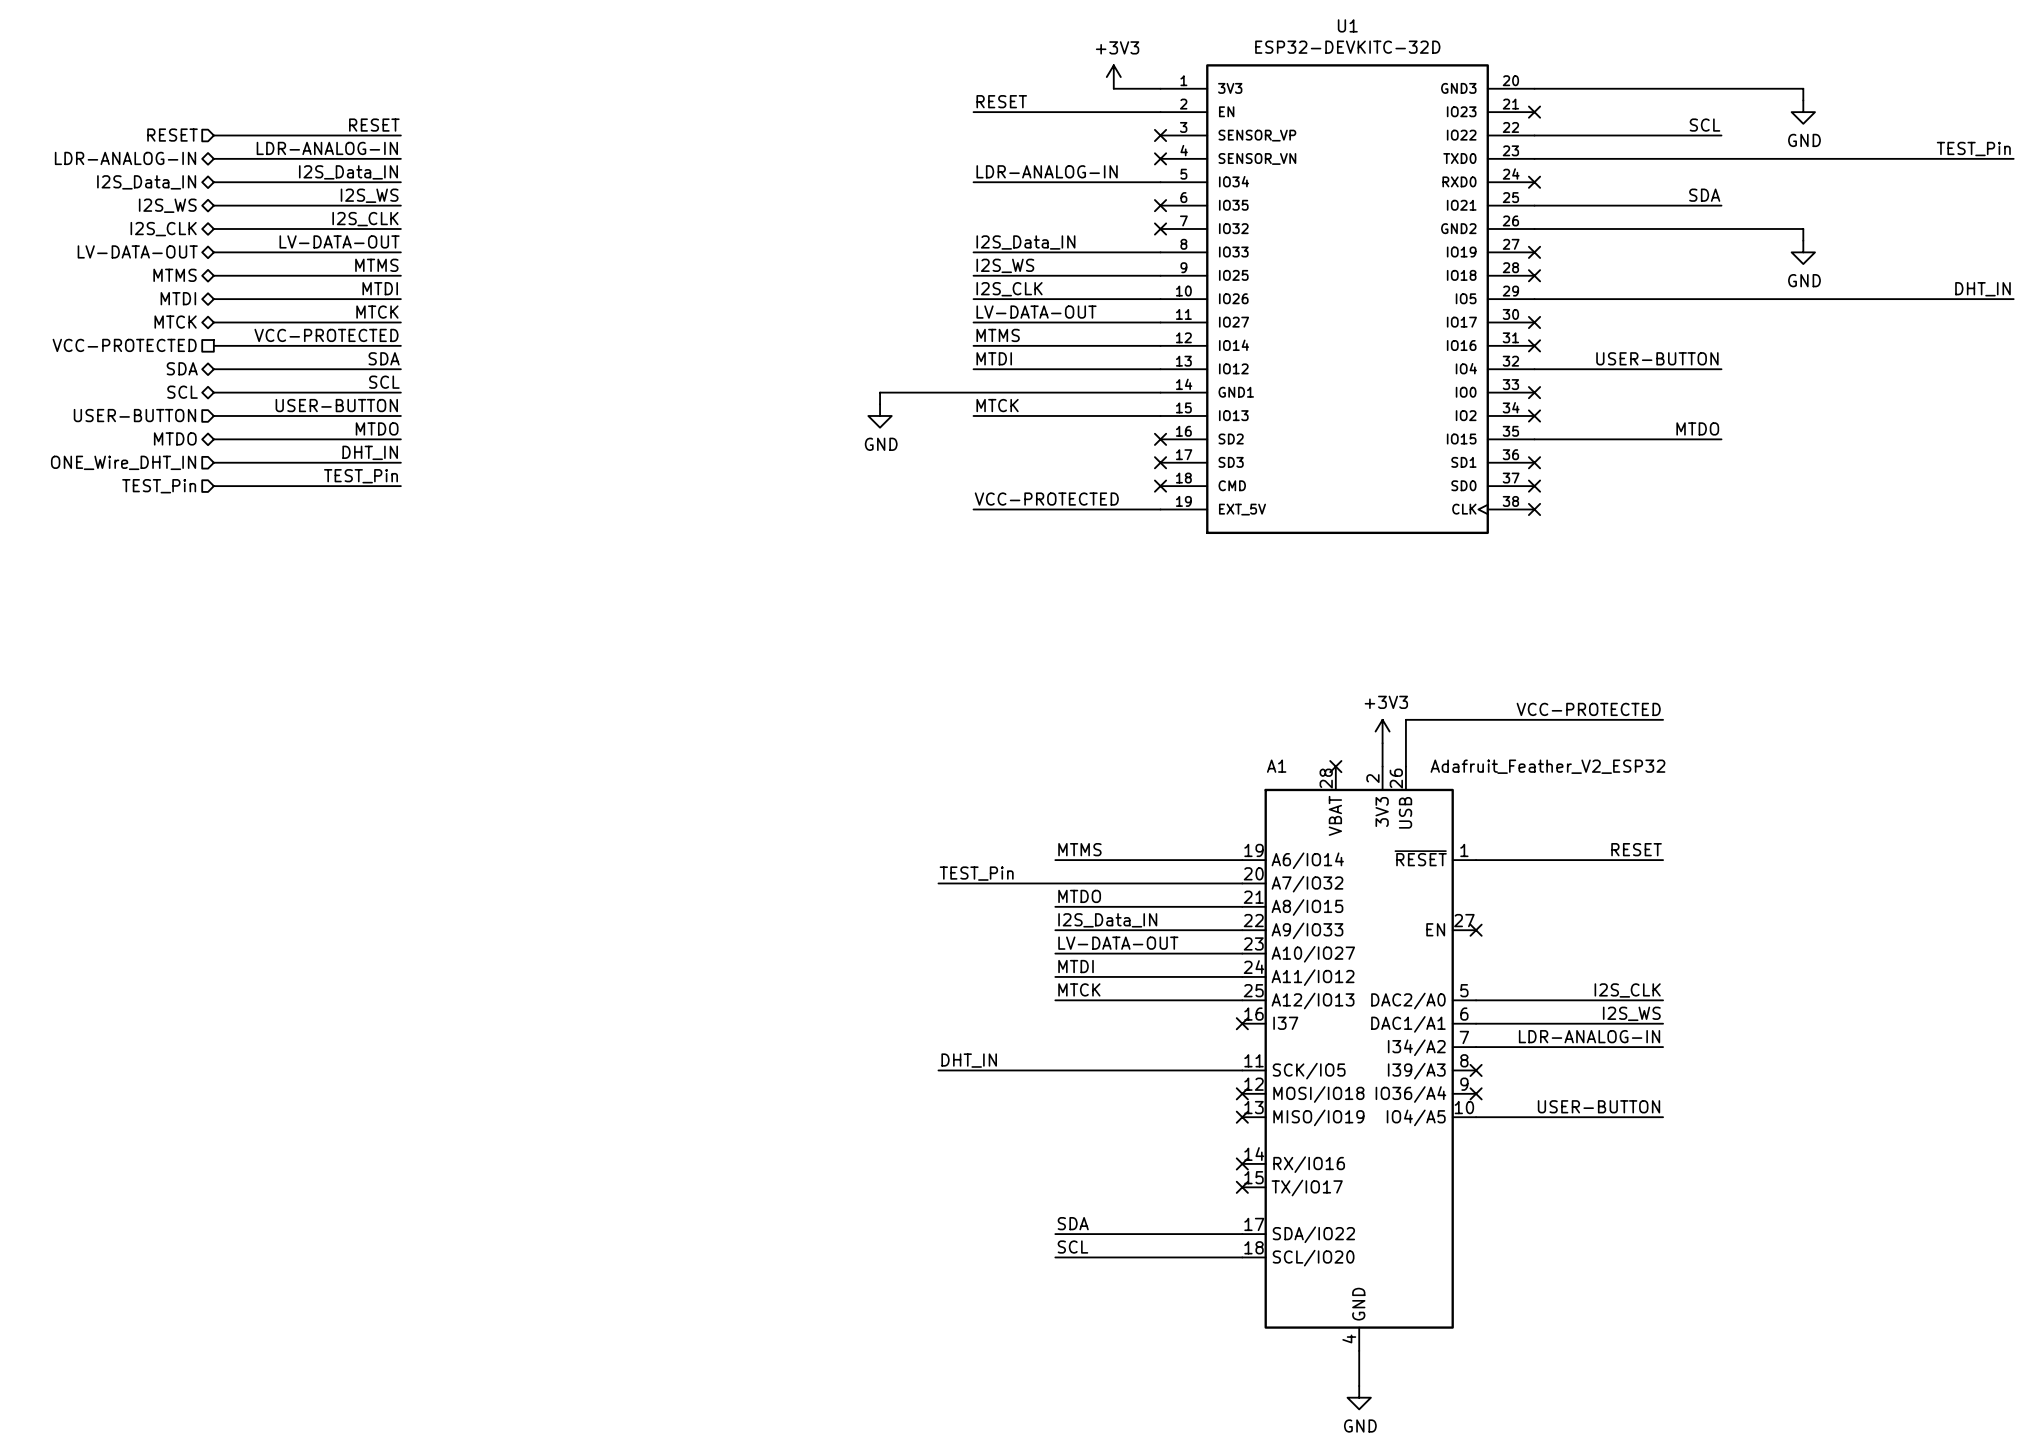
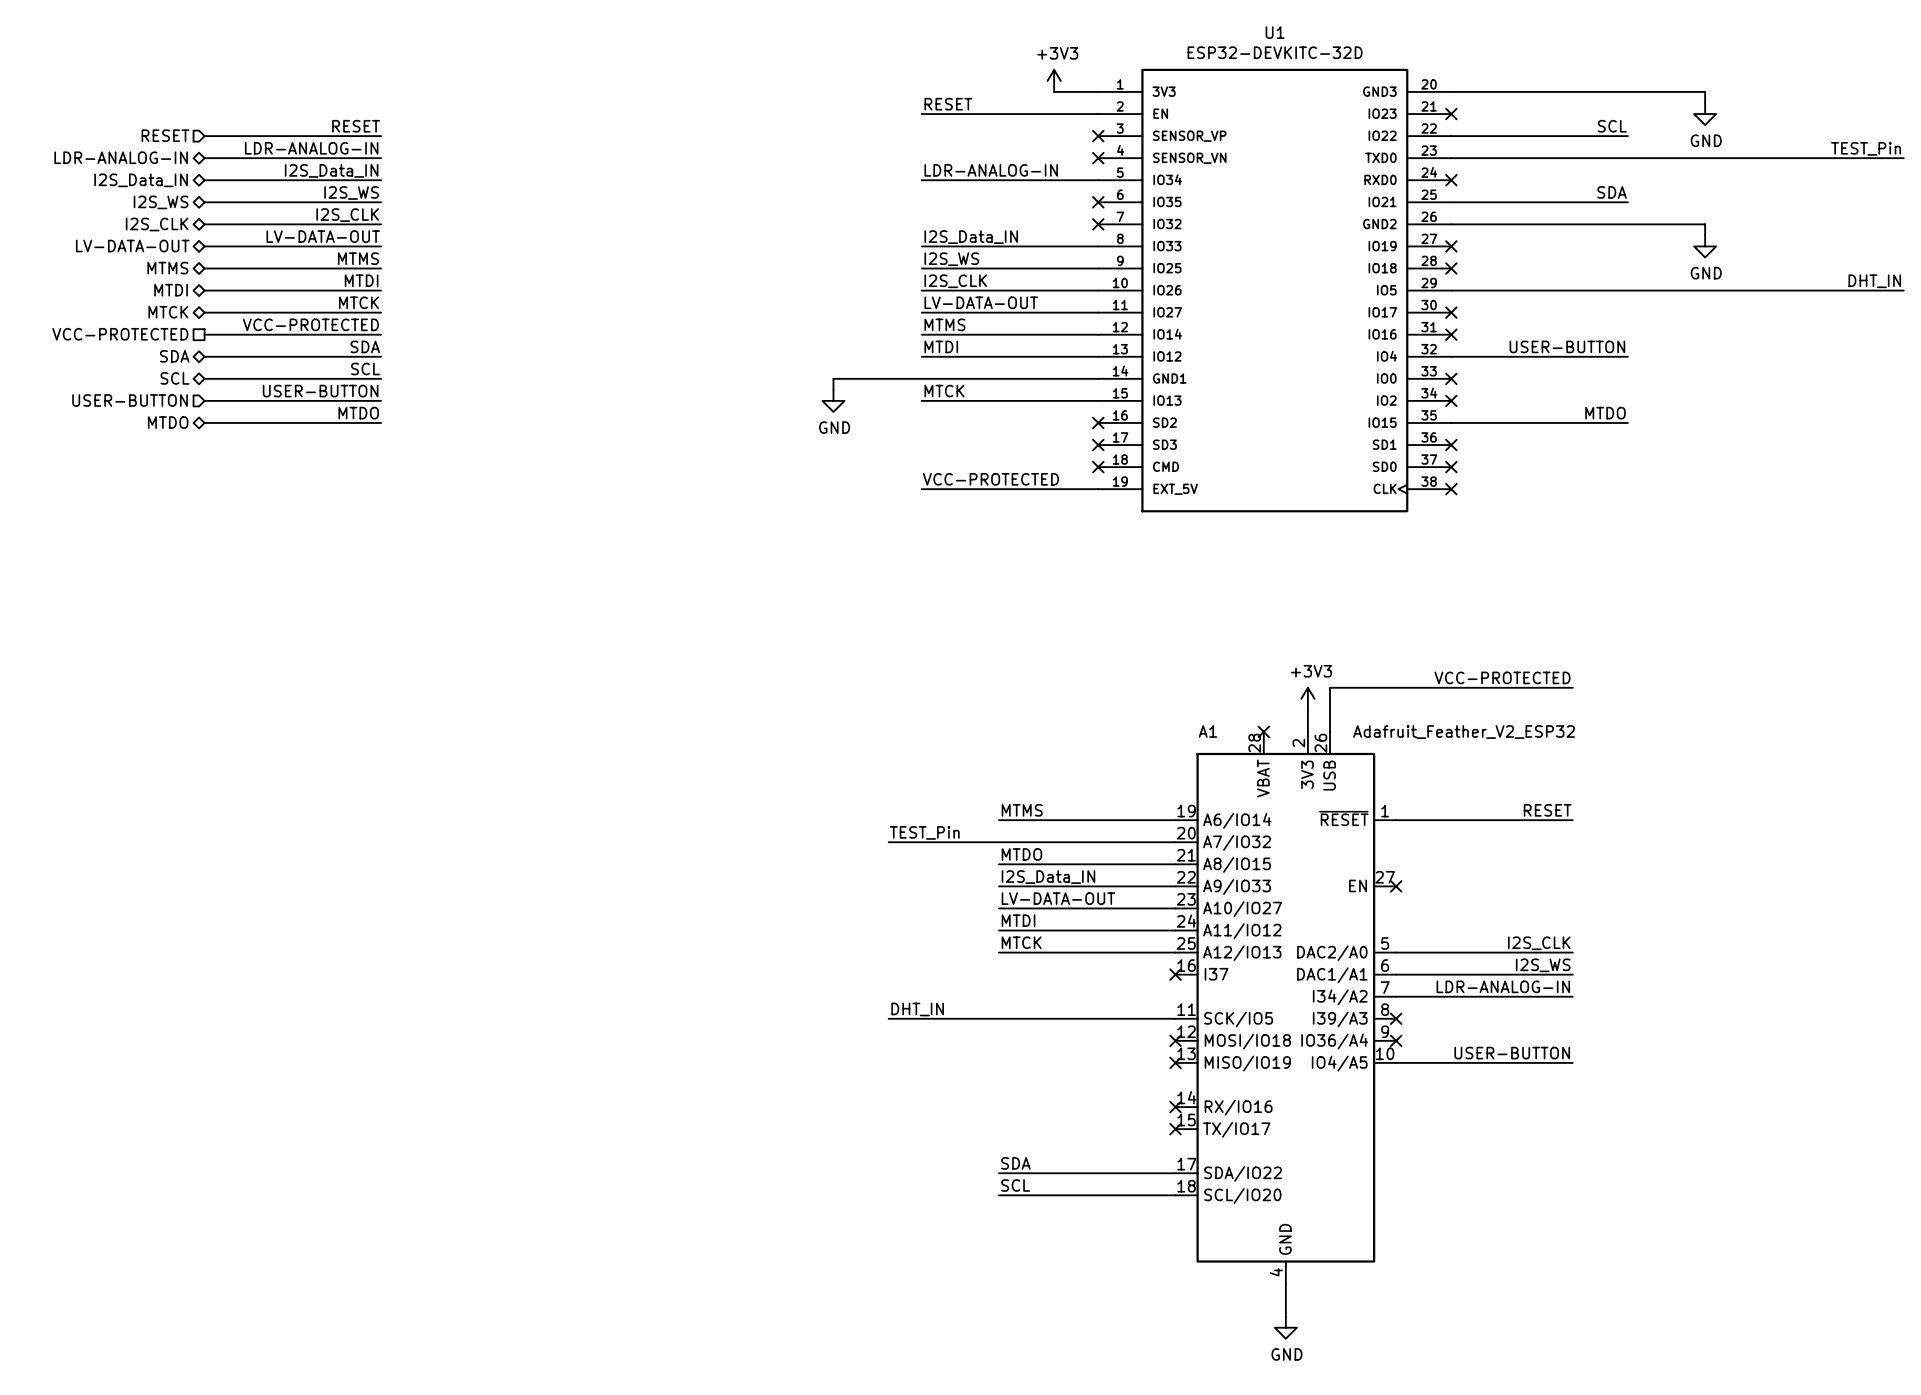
label: DHT_IN (370, 452) -> none
hierarchical label: ONE_Wire_DHT_IN (123, 462) -> none
wire: (213, 462) (400, 462) -> none
label: TEST_Pin (360, 476) -> none
hierarchical label: TEST_Pin (159, 486) -> none
wire: (213, 486) (400, 486) -> none

